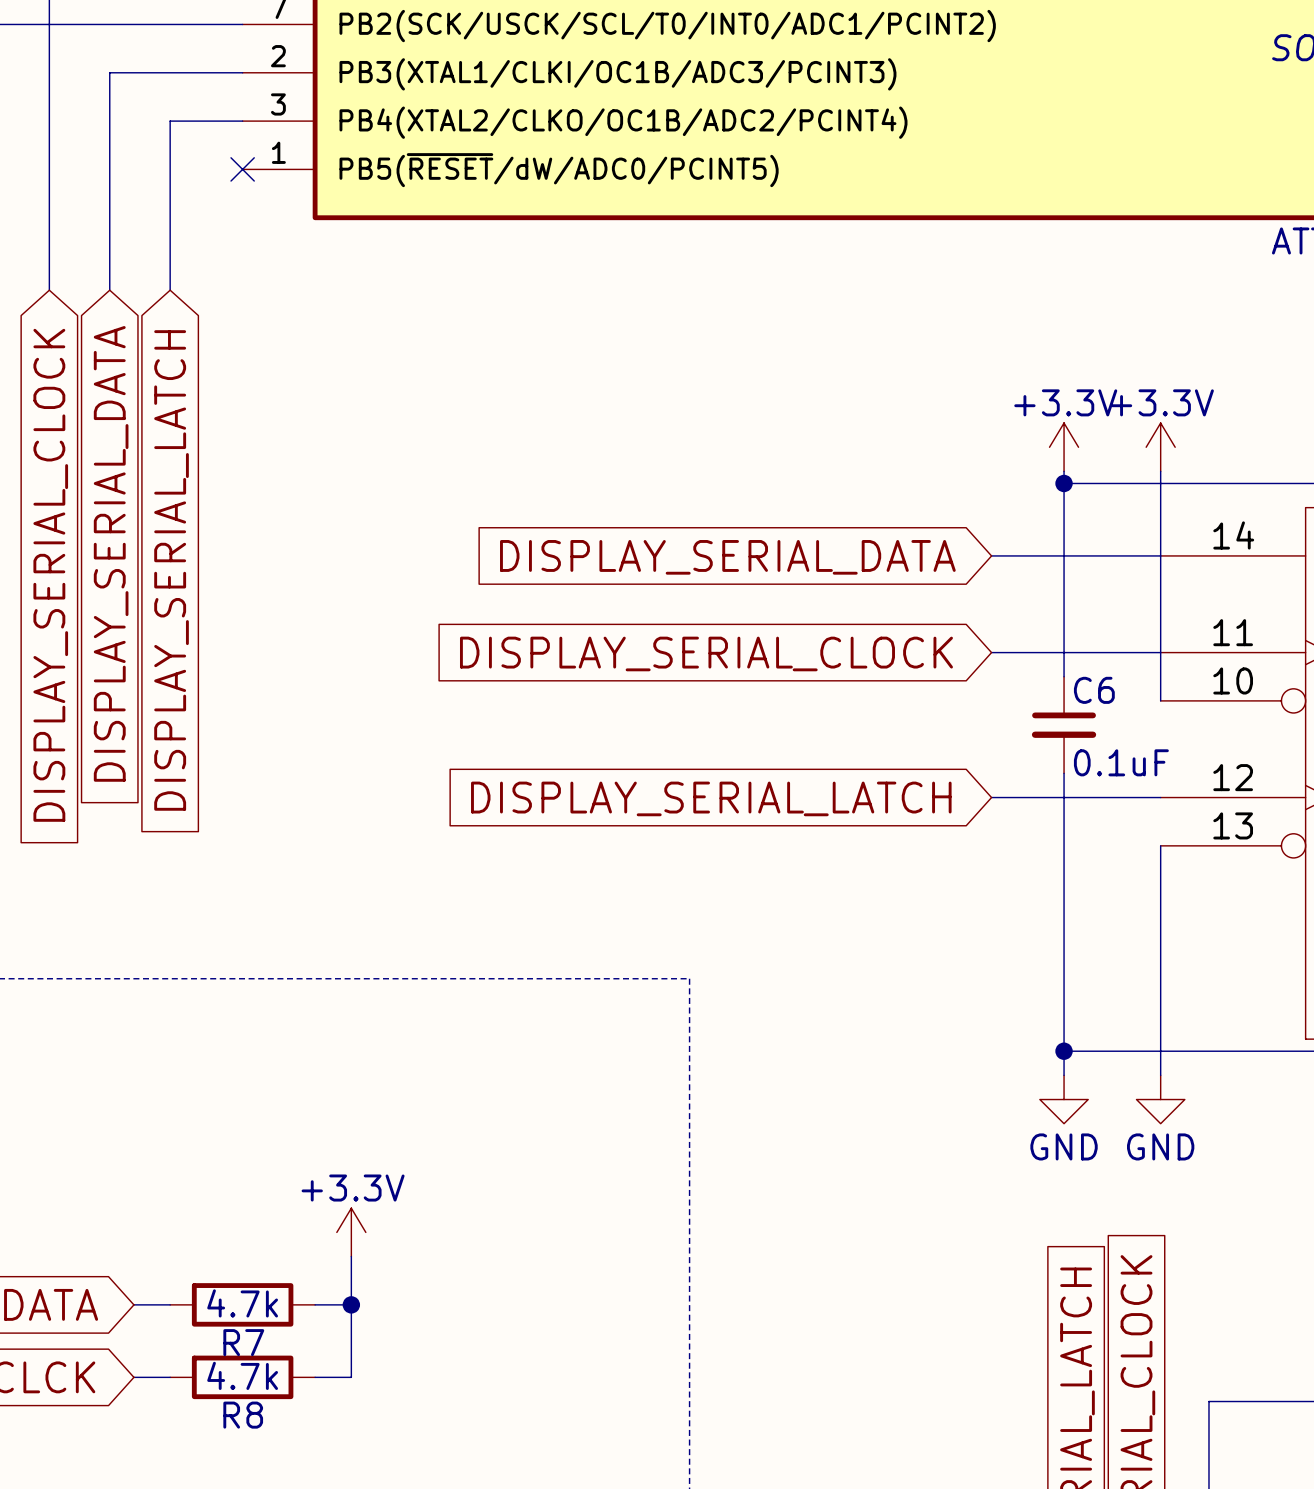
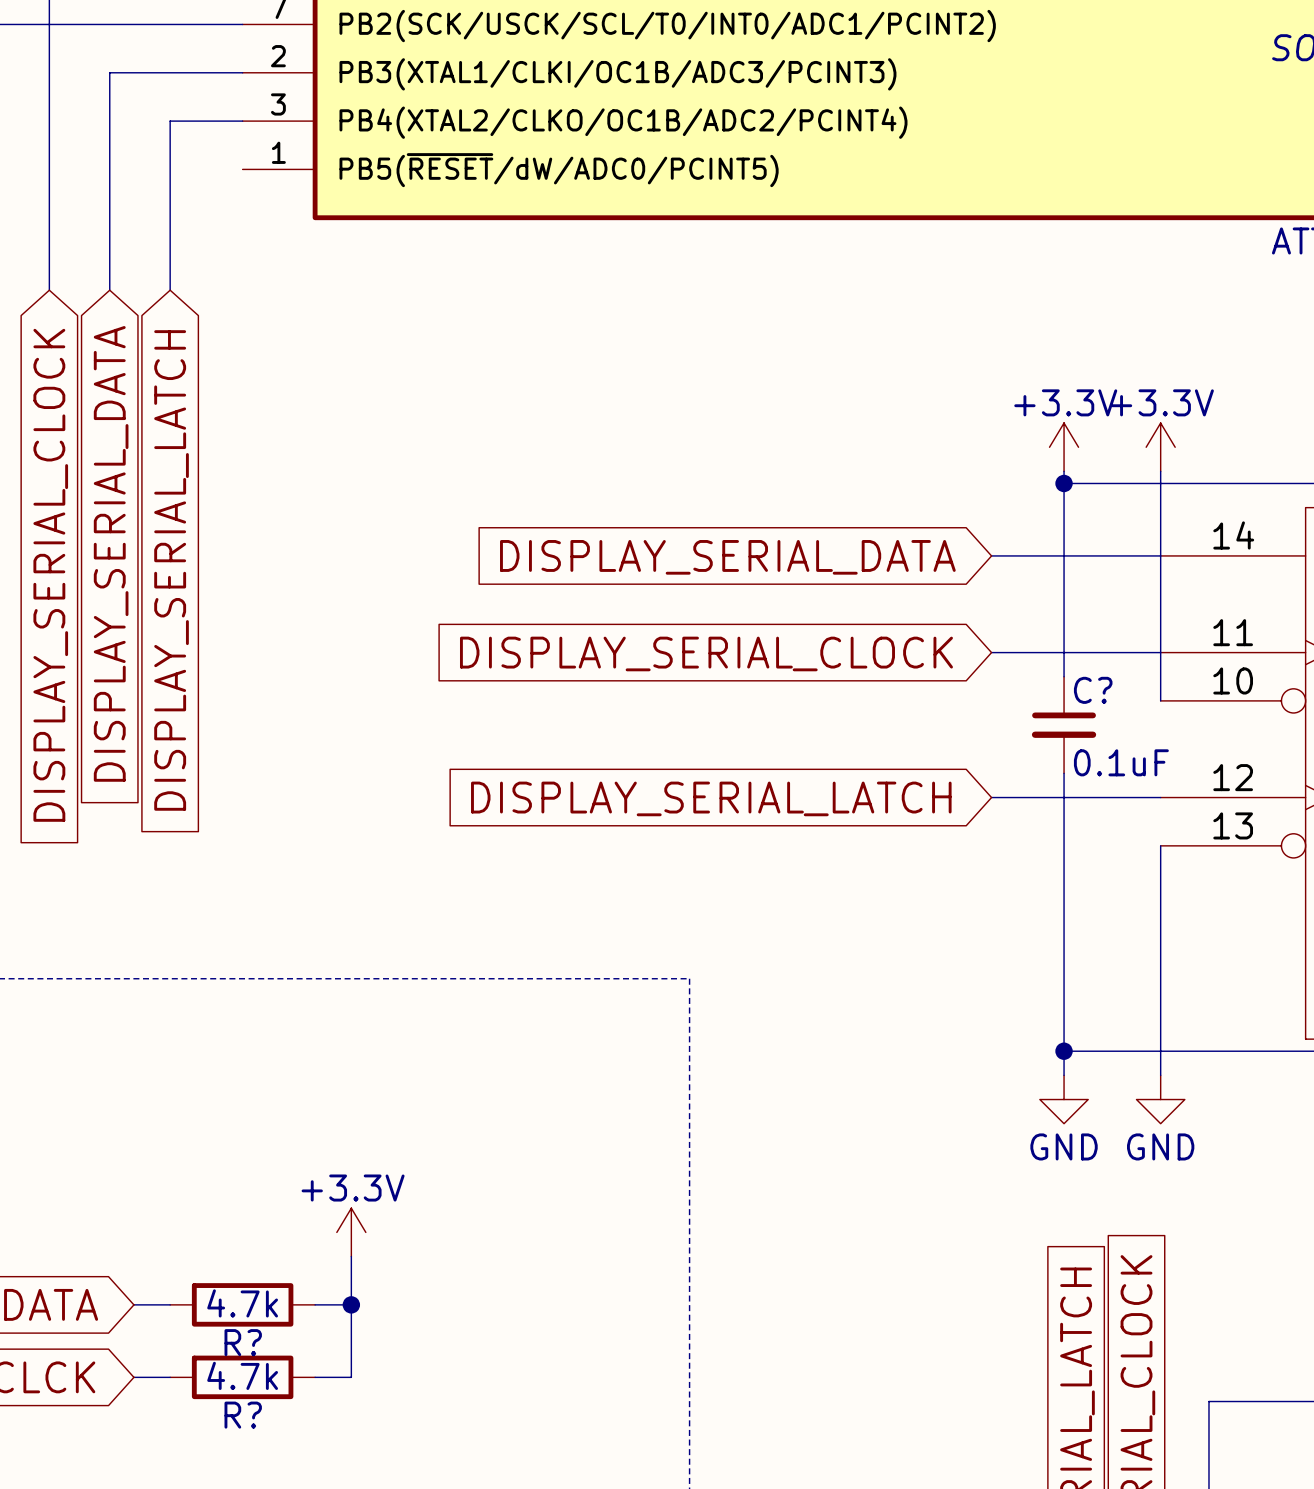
no-connect mark: (242, 169) -> none
C6 name: C6 (1094, 690) -> C? (1093, 690)
R7 name: R7 (243, 1342) -> R? (243, 1342)
R8 name: R8 (243, 1415) -> R? (243, 1415)

